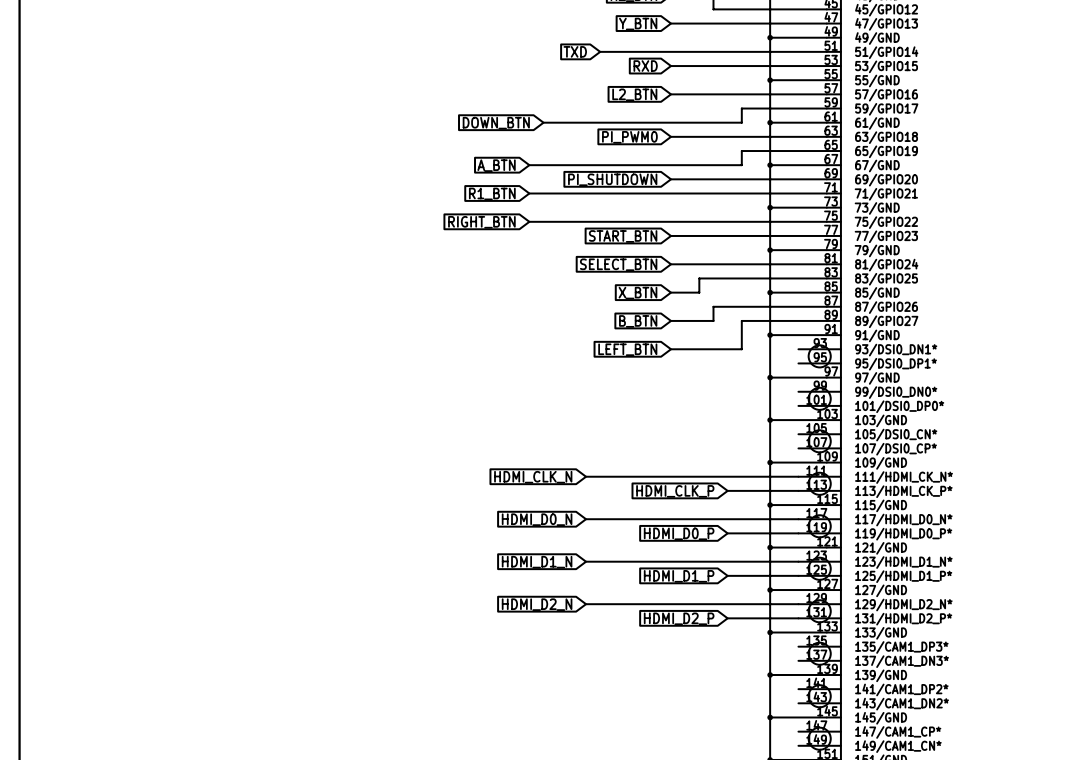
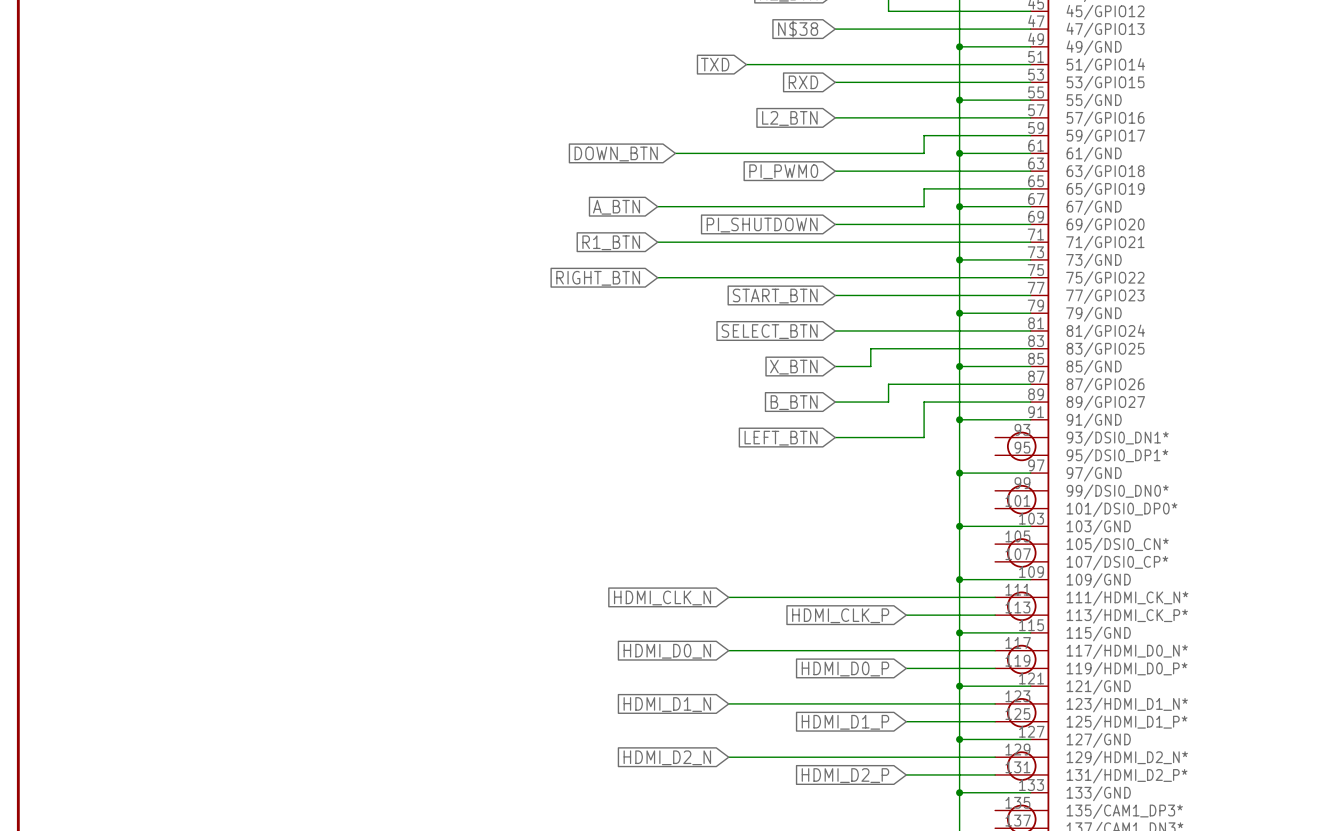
global label: Y_BTN (638, 24) -> N$38 (798, 29)

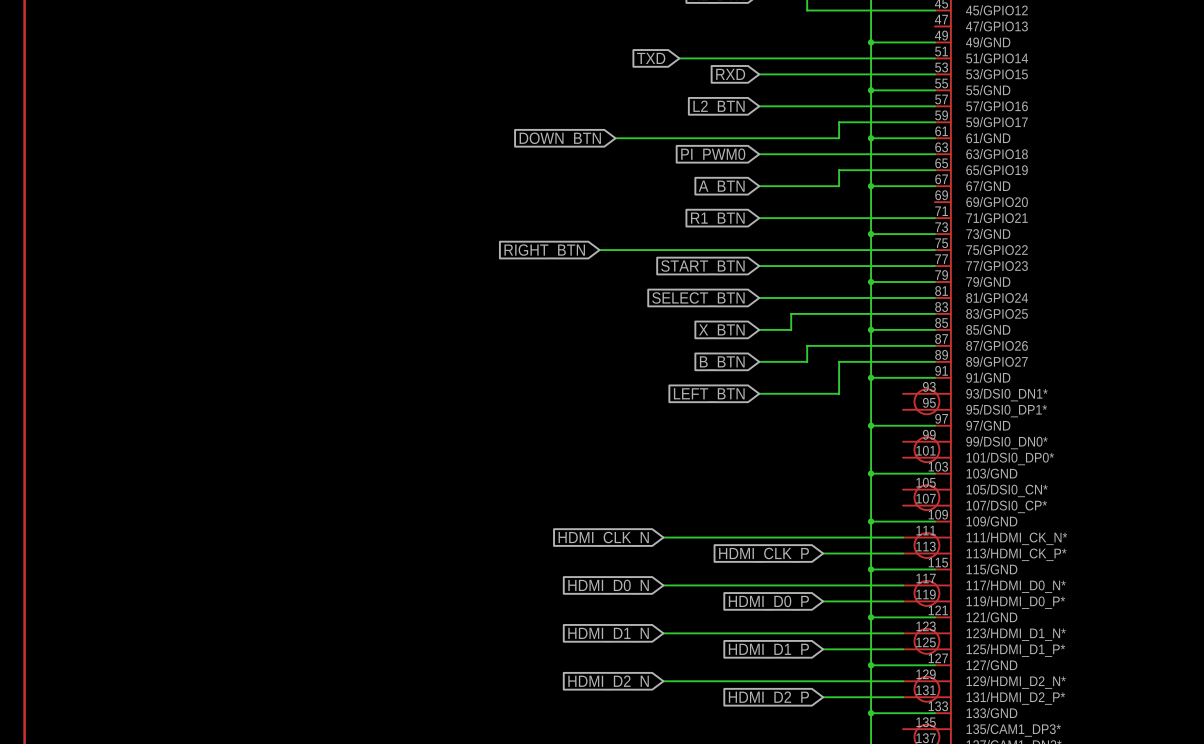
global label: N$38 (798, 29) -> none
wire: (835, 29) (1030, 29) -> none
wire: (657, 206) (835, 206) -> none
global label: A_BTN (616, 207) -> none
global label: none -> A_BTN (721, 187)
wire: (835, 224) (1030, 224) -> none
global label: PI_SHUTDOWN (762, 225) -> none
global label: R1_BTN (611, 242) -> none
wire: (657, 242) (835, 242) -> none
global label: none -> R1_BTN (717, 219)

